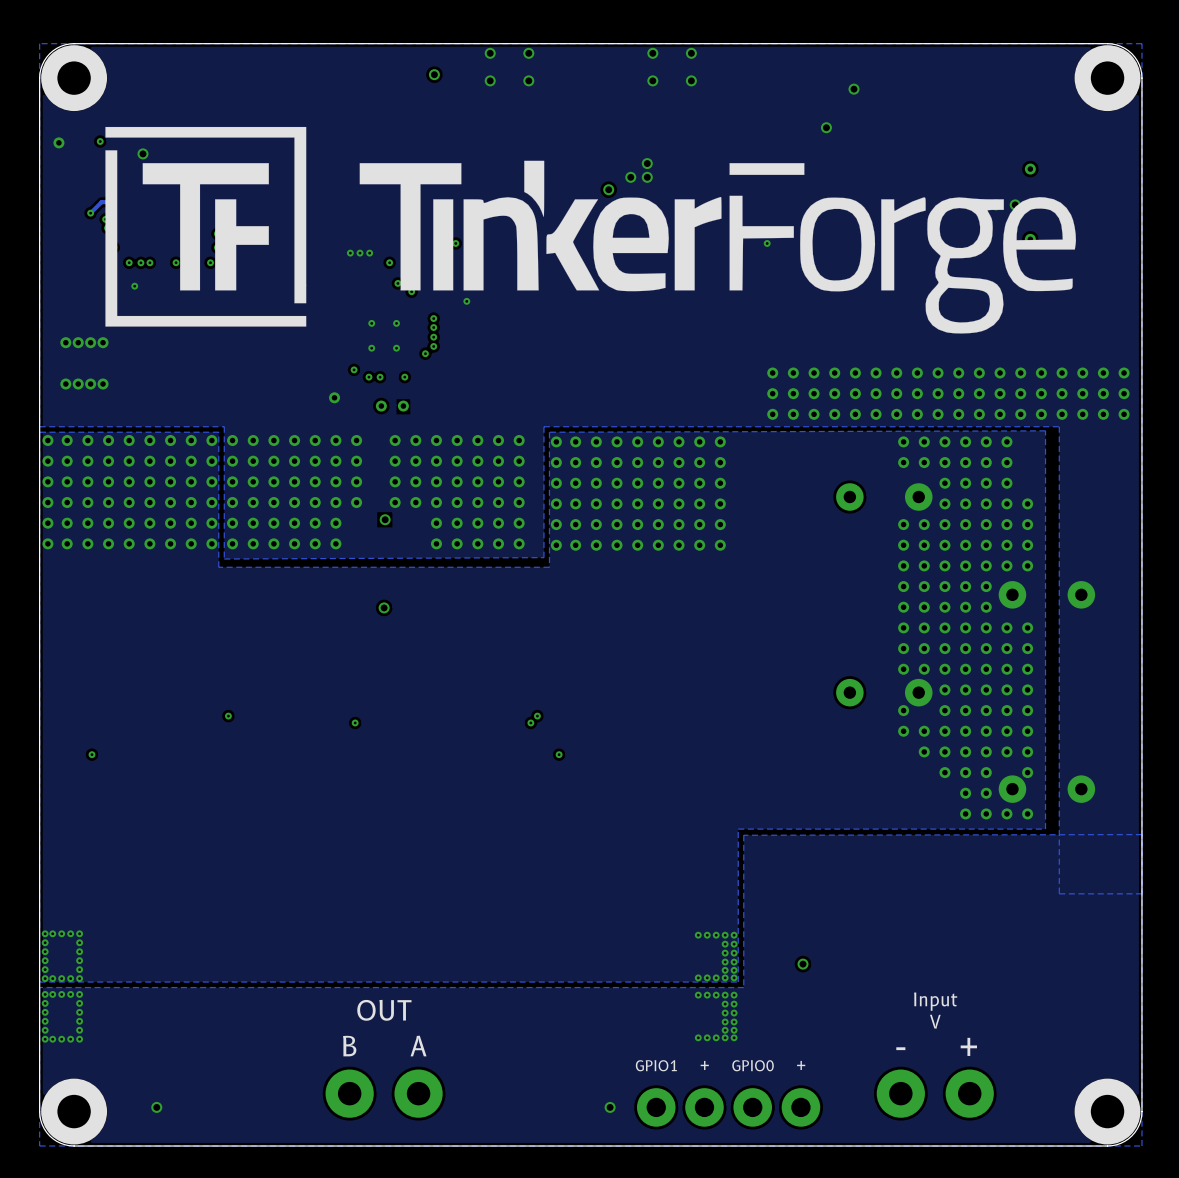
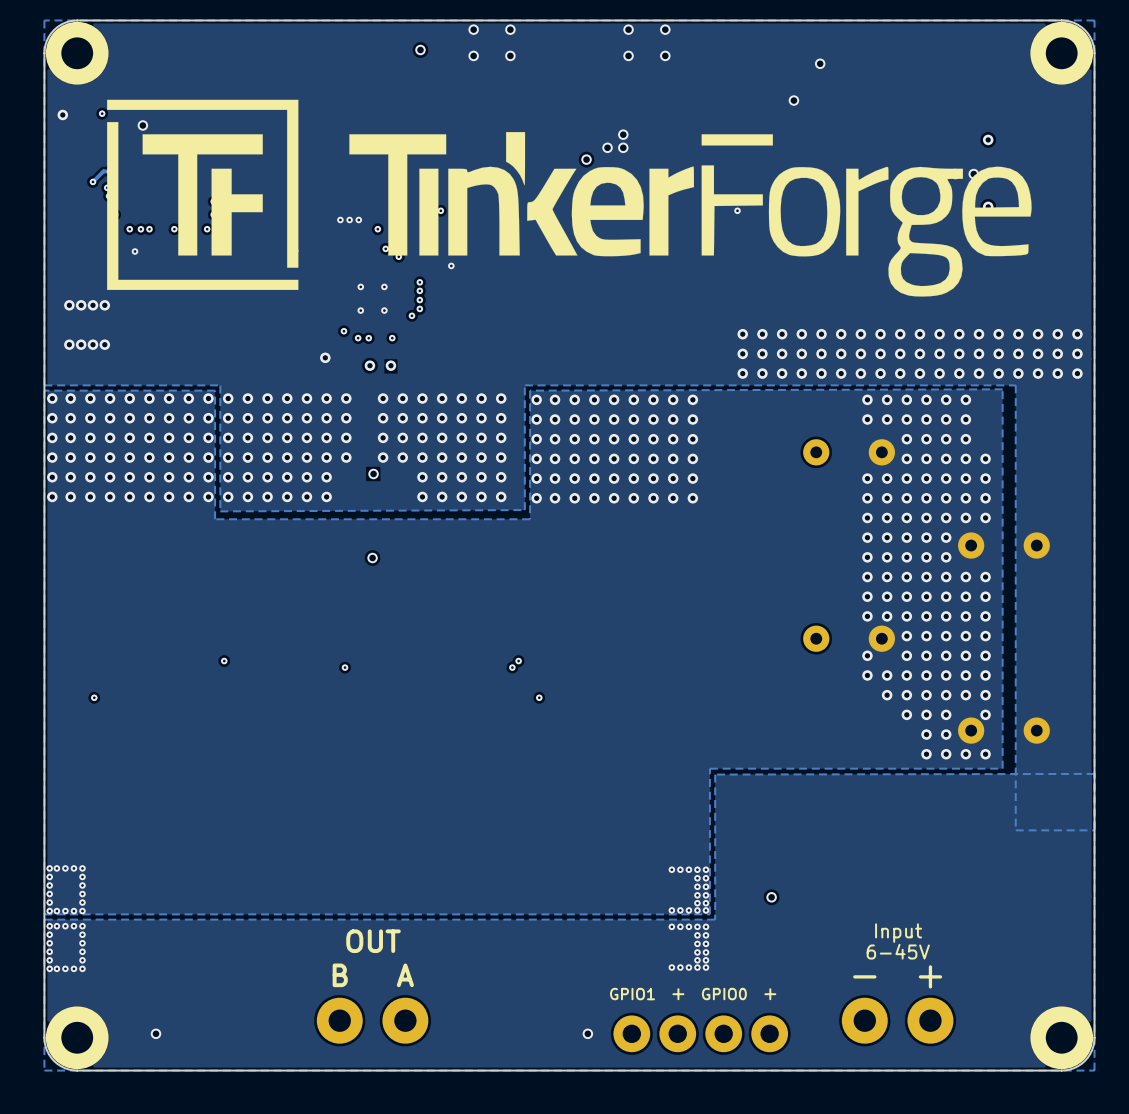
text: V (935, 1021) -> 6-45V (898, 951)

